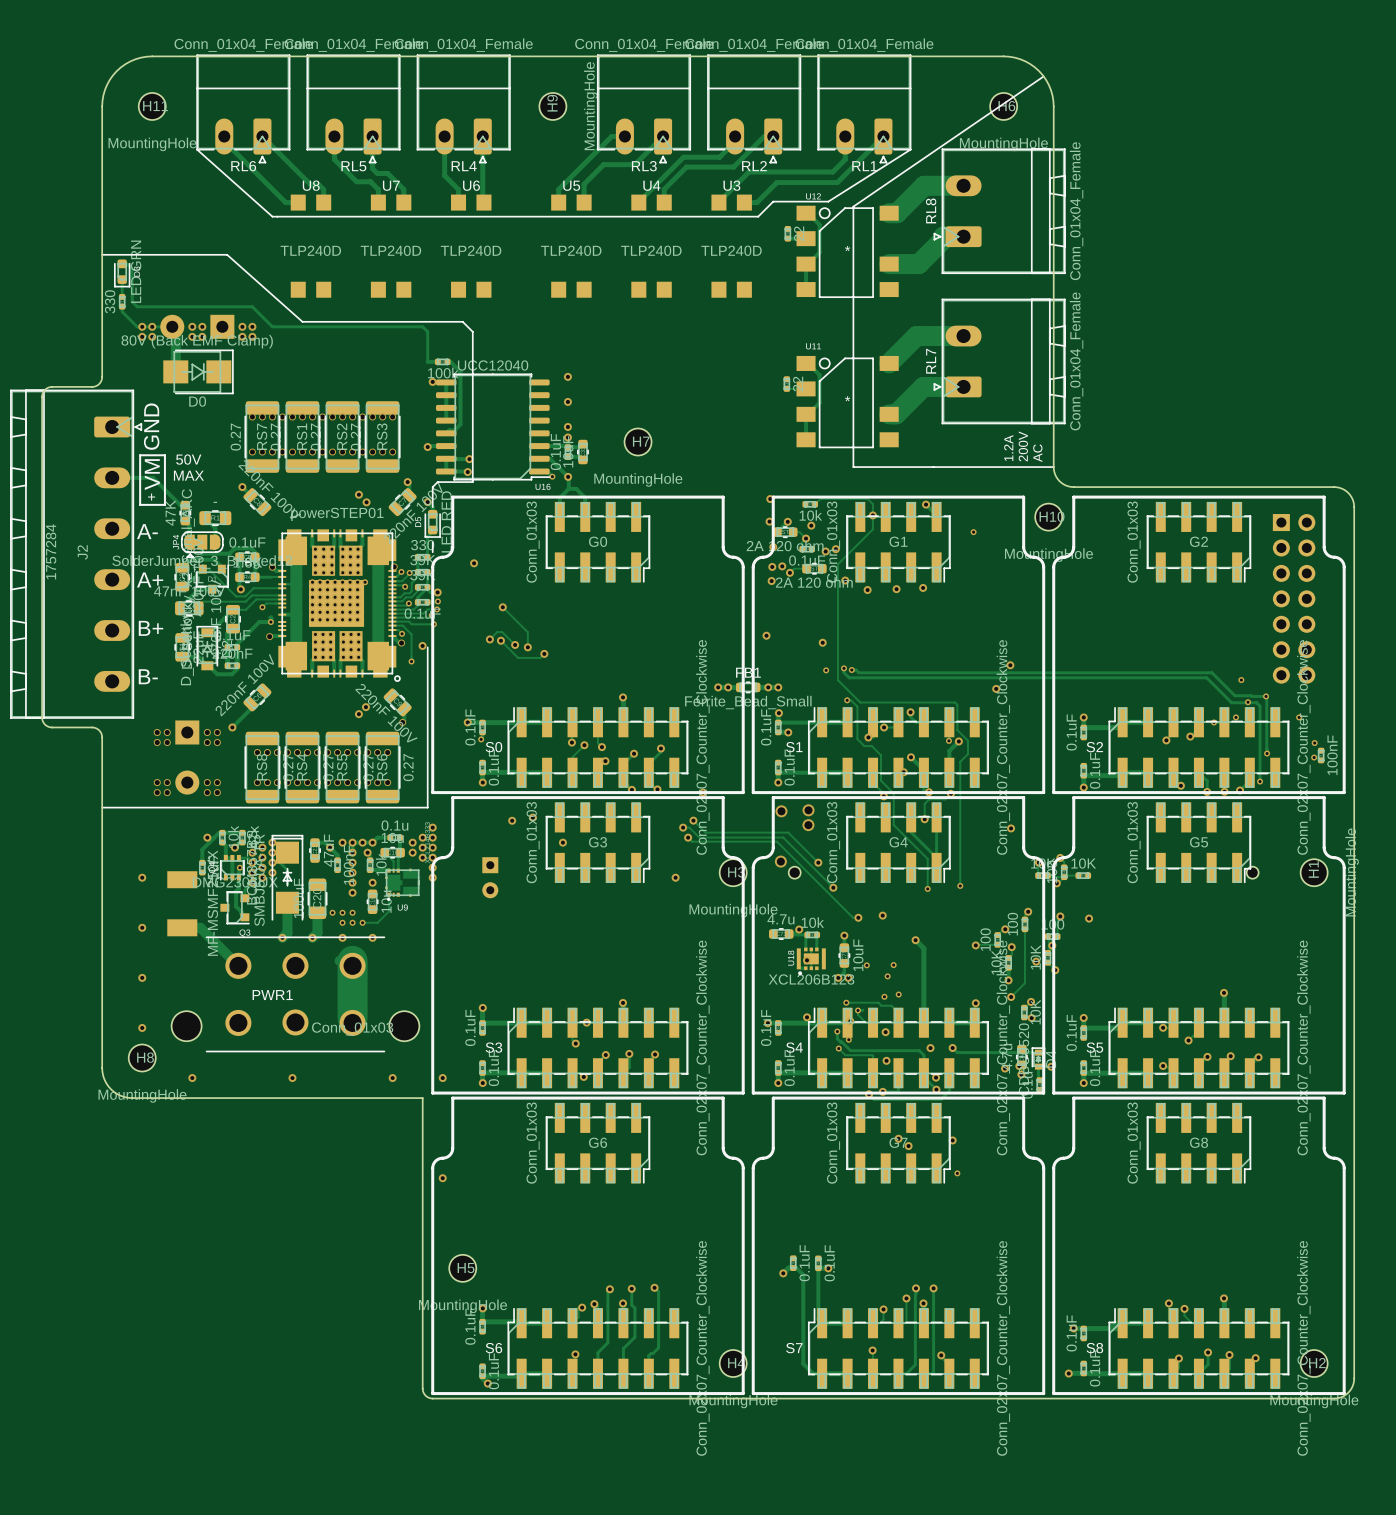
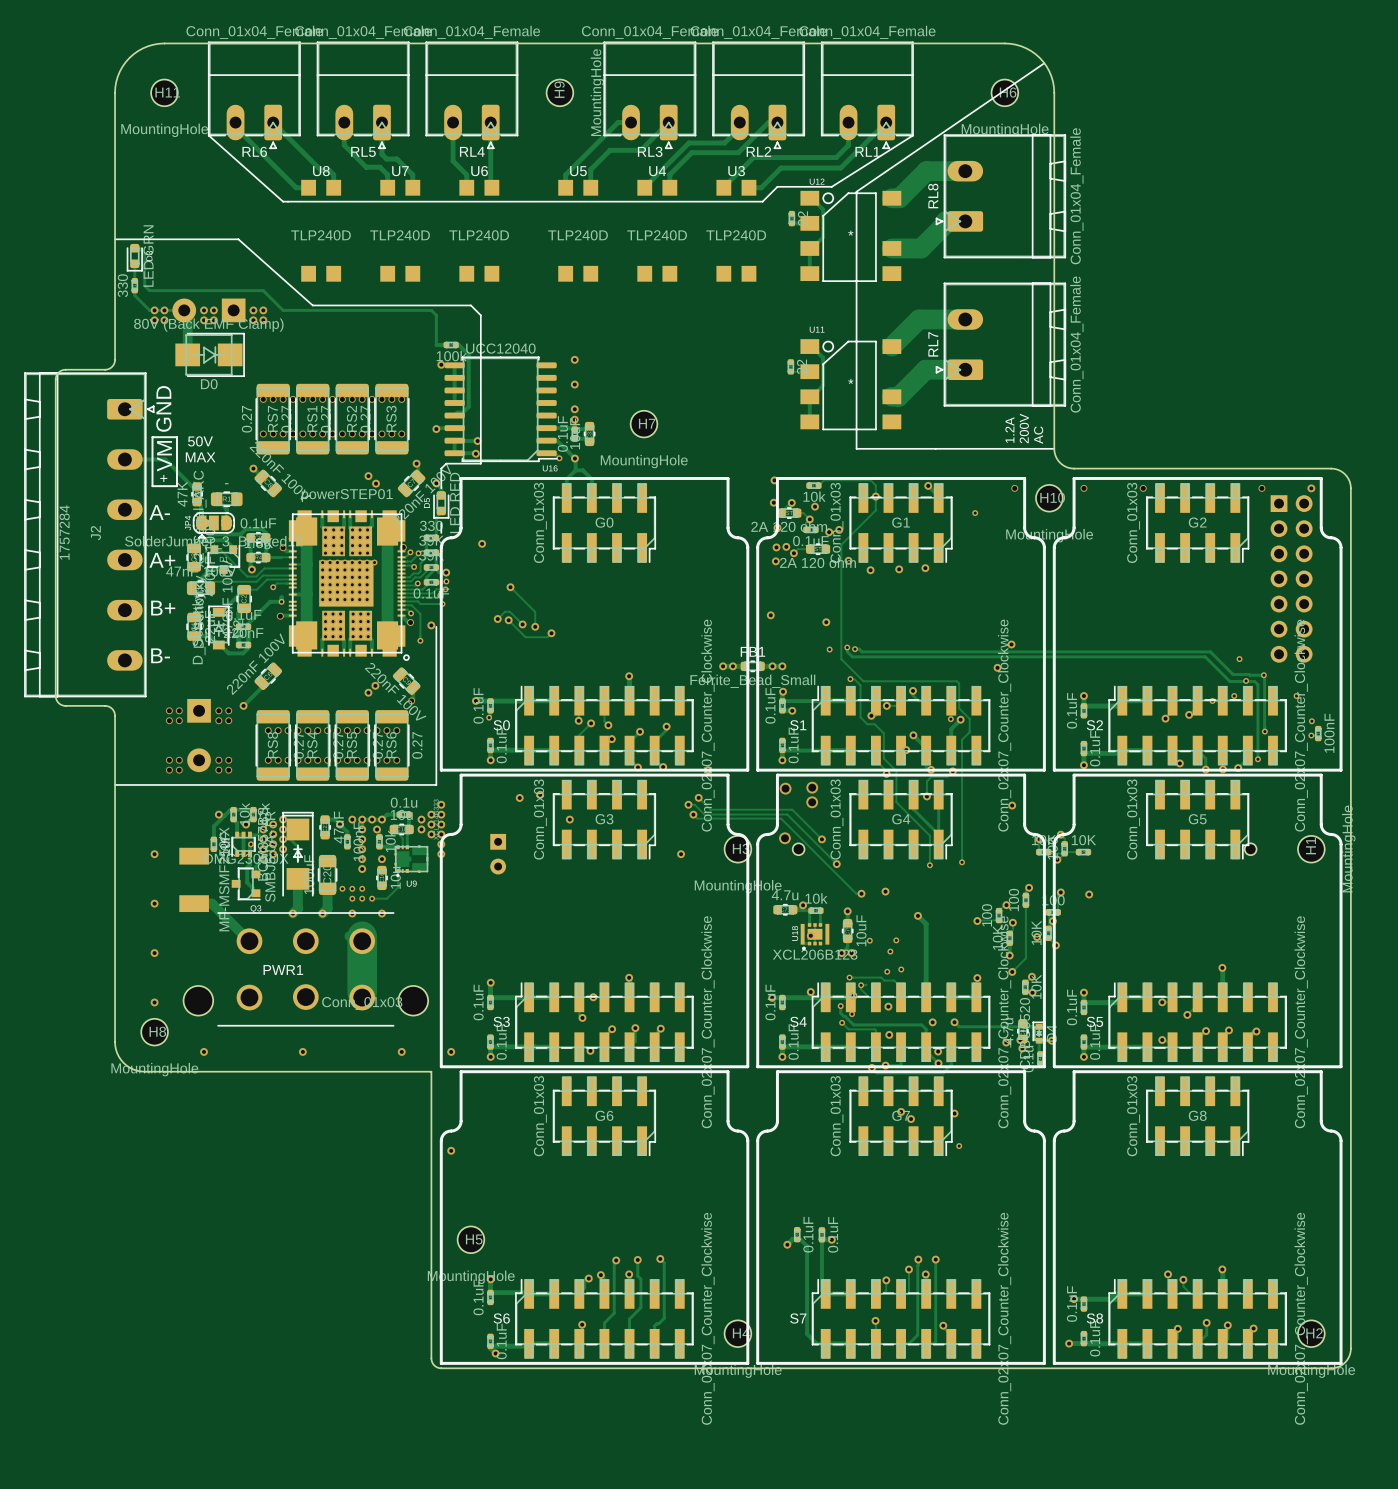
via: none -> (1014, 488)
via: none -> (1083, 488)
via: none -> (1143, 488)
via: none -> (1261, 488)
via: none -> (1311, 488)

